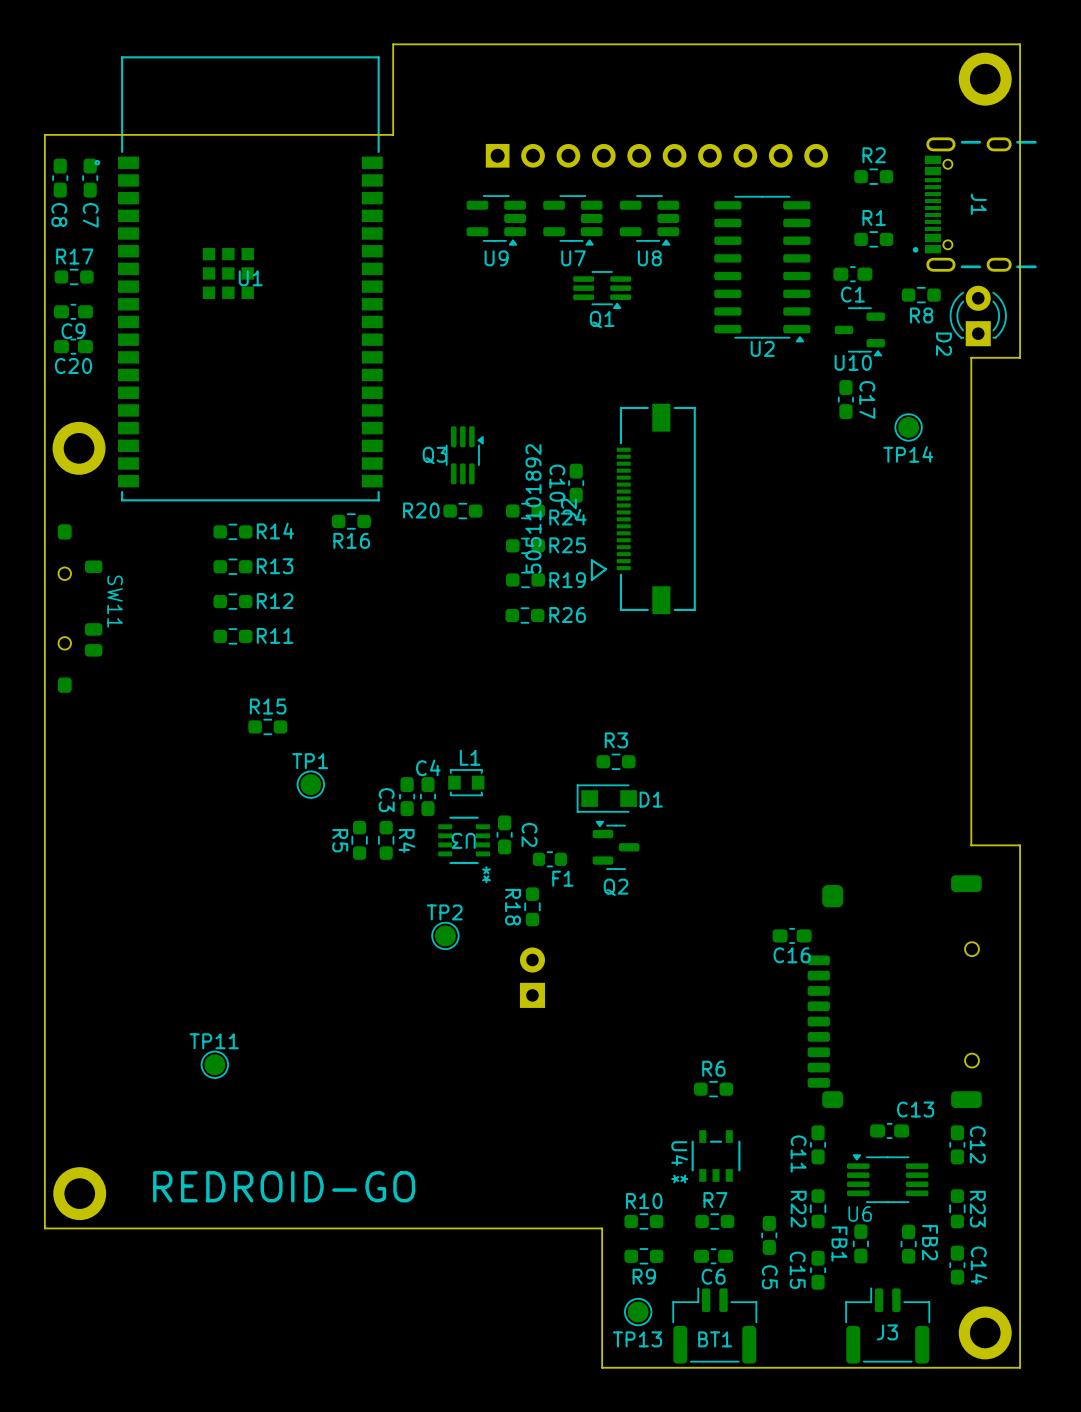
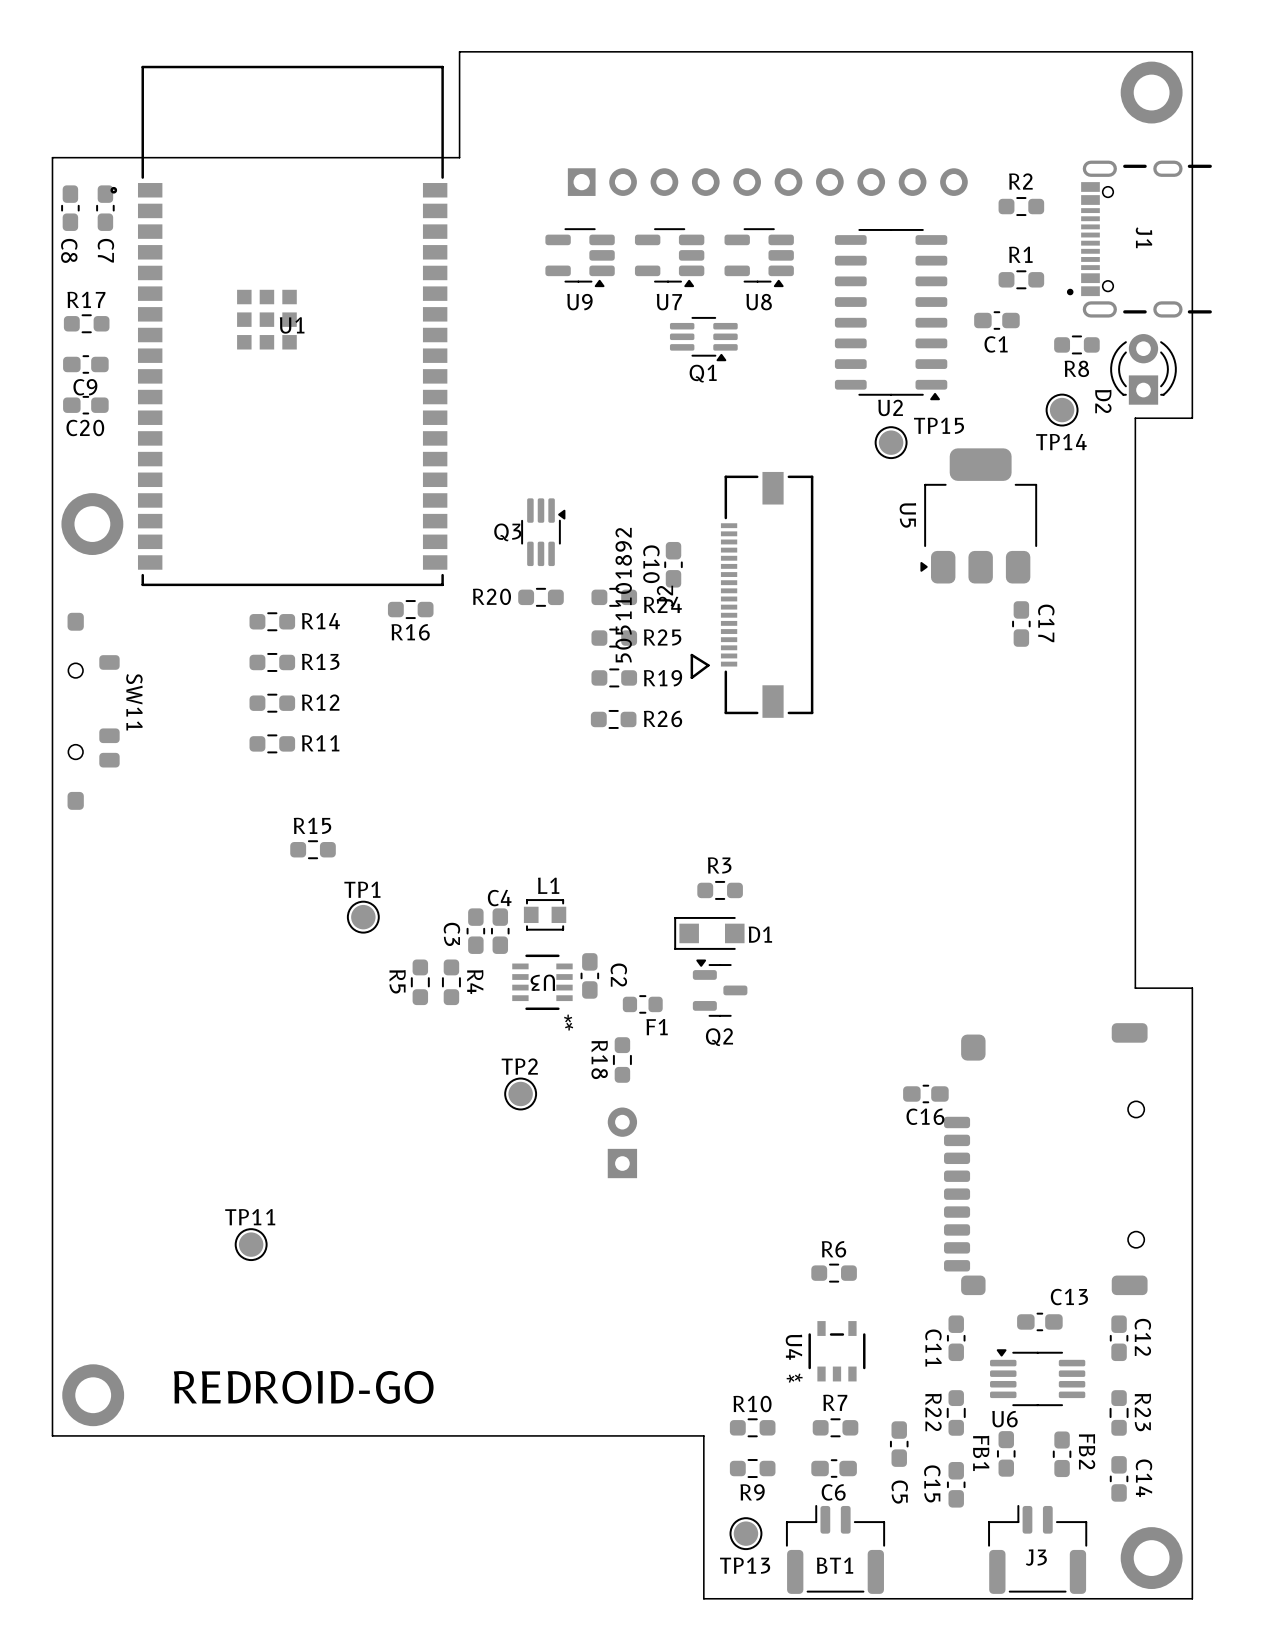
U10: (859, 331) -> none
TP15: none -> (891, 442)
C17 position: (845, 399) -> (1021, 624)
TP14 position: (908, 427) -> (1062, 410)
U5: none -> (978, 515)

